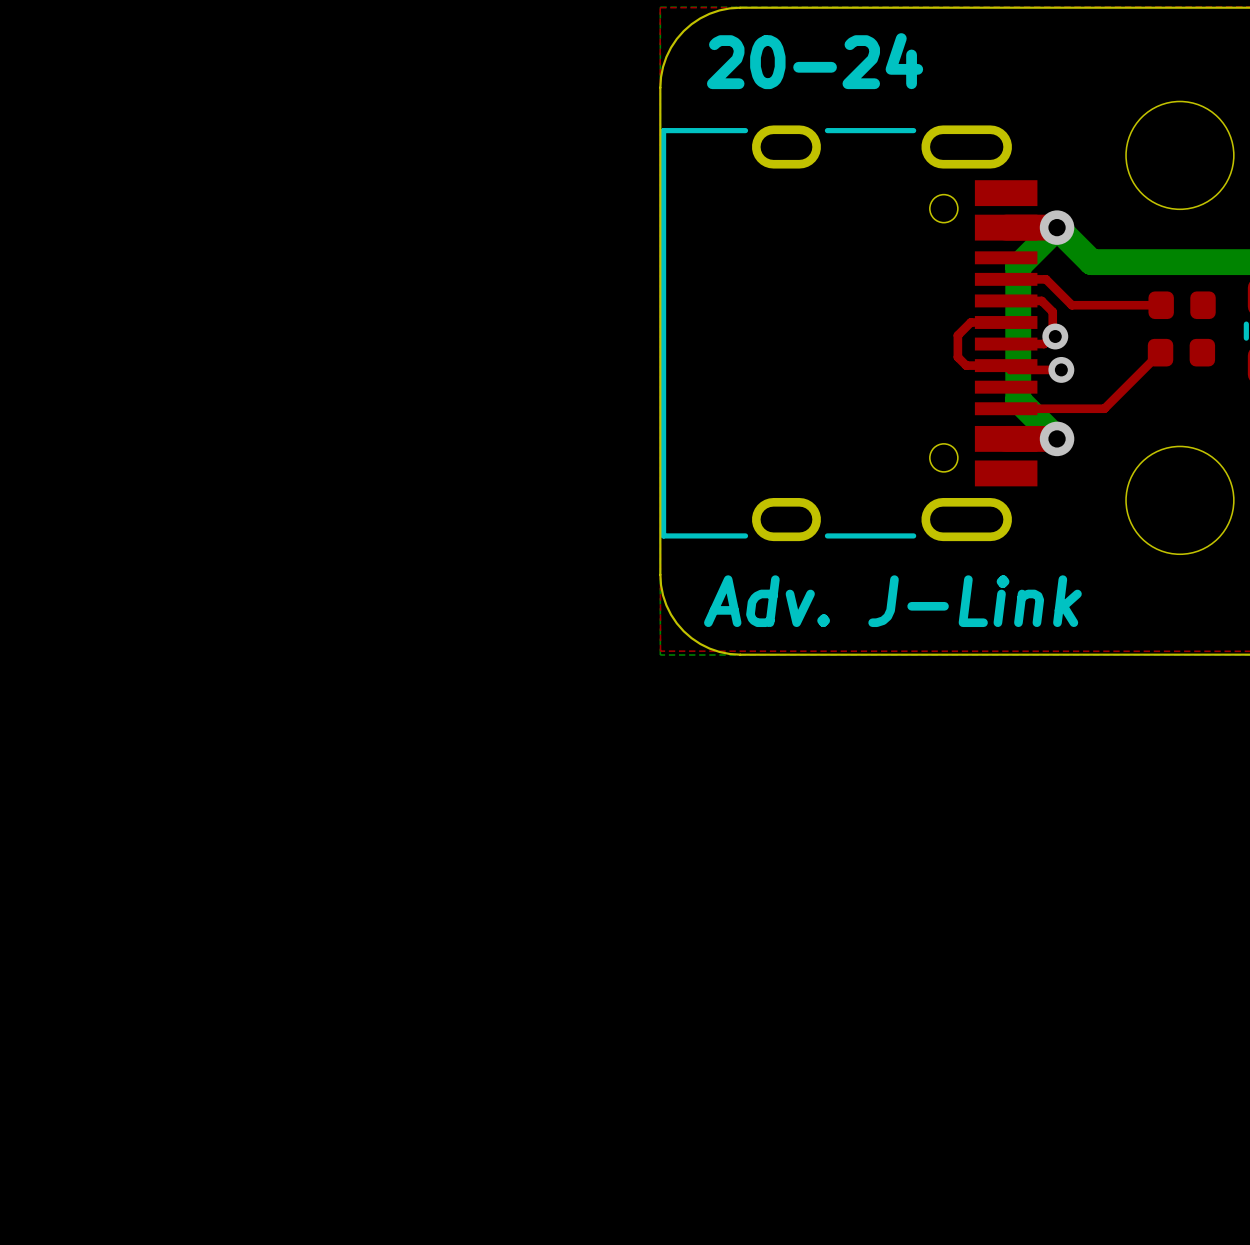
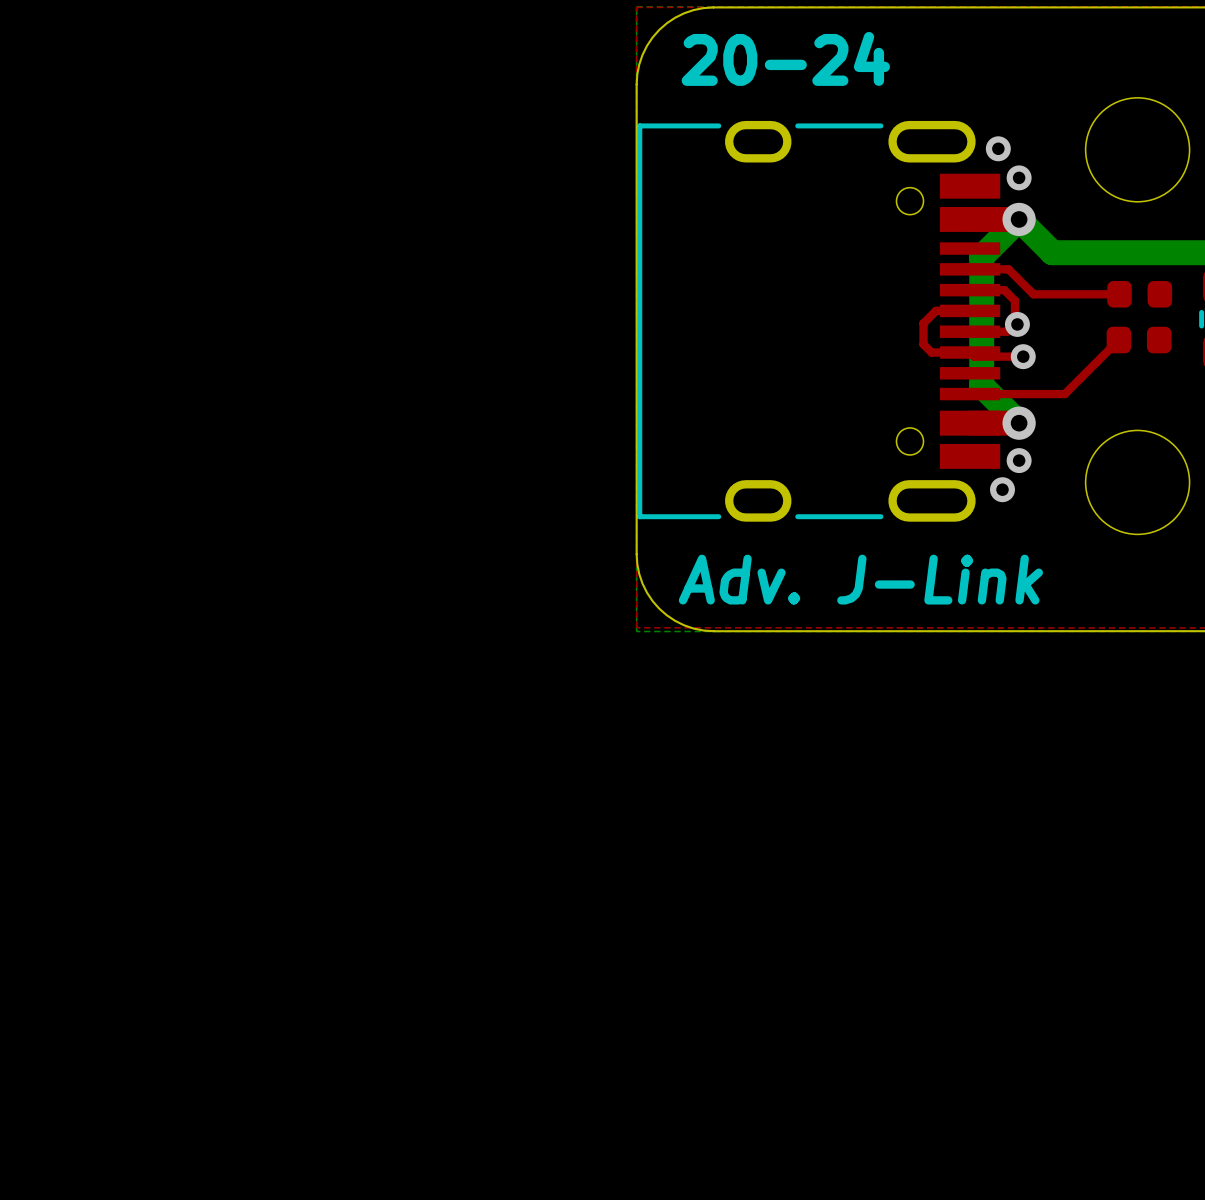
via: none -> (998, 148)
via: none -> (1019, 177)
via: none -> (1019, 460)
via: none -> (1002, 489)

